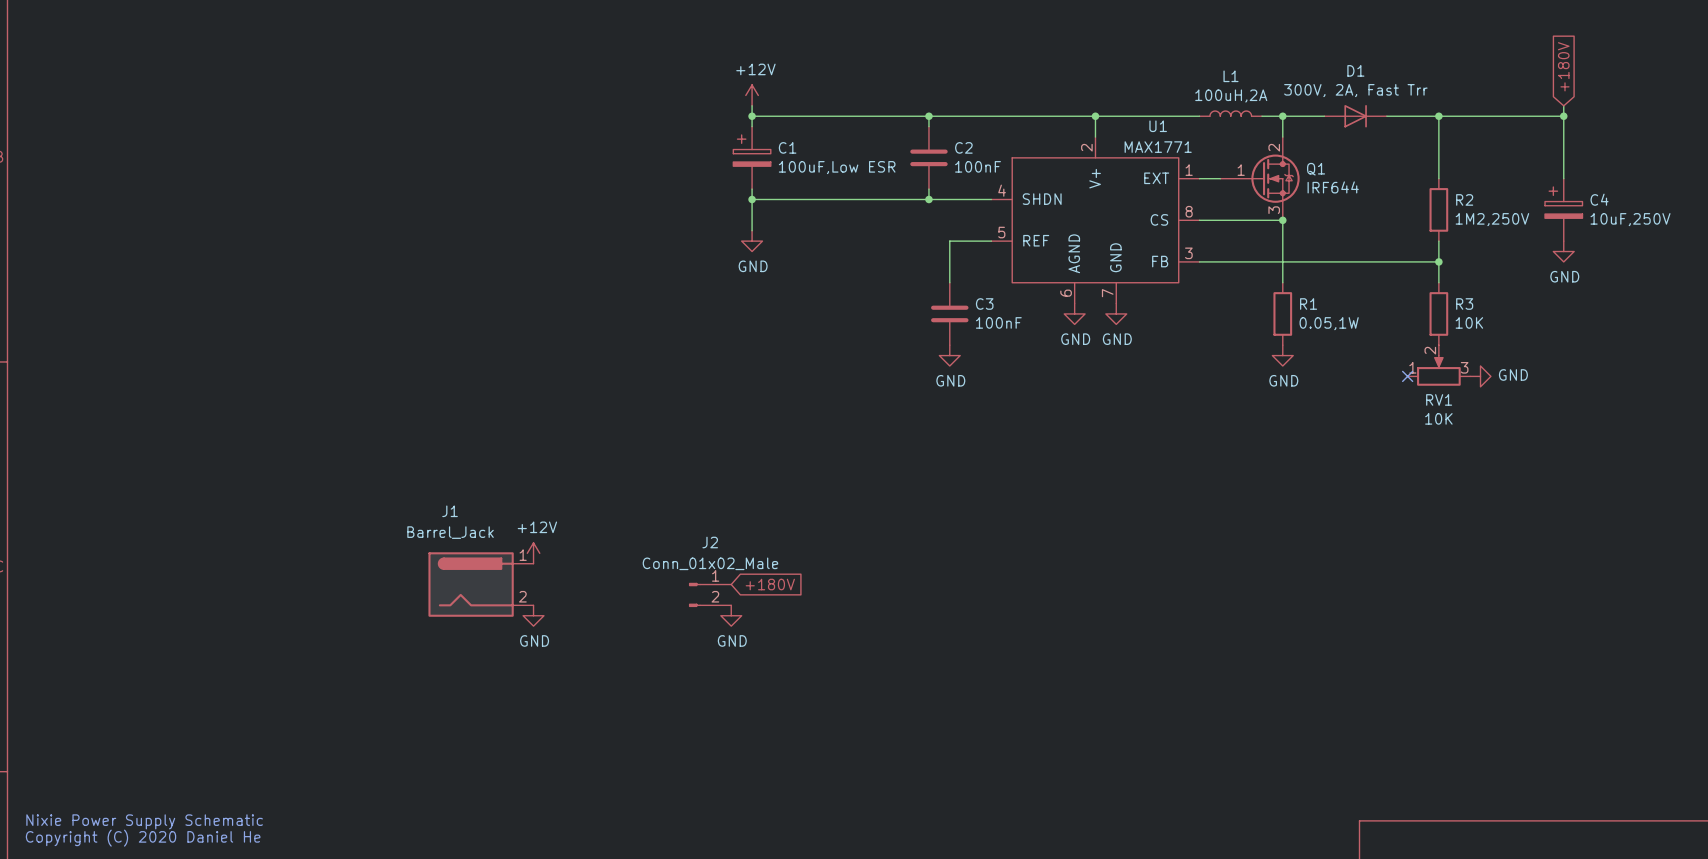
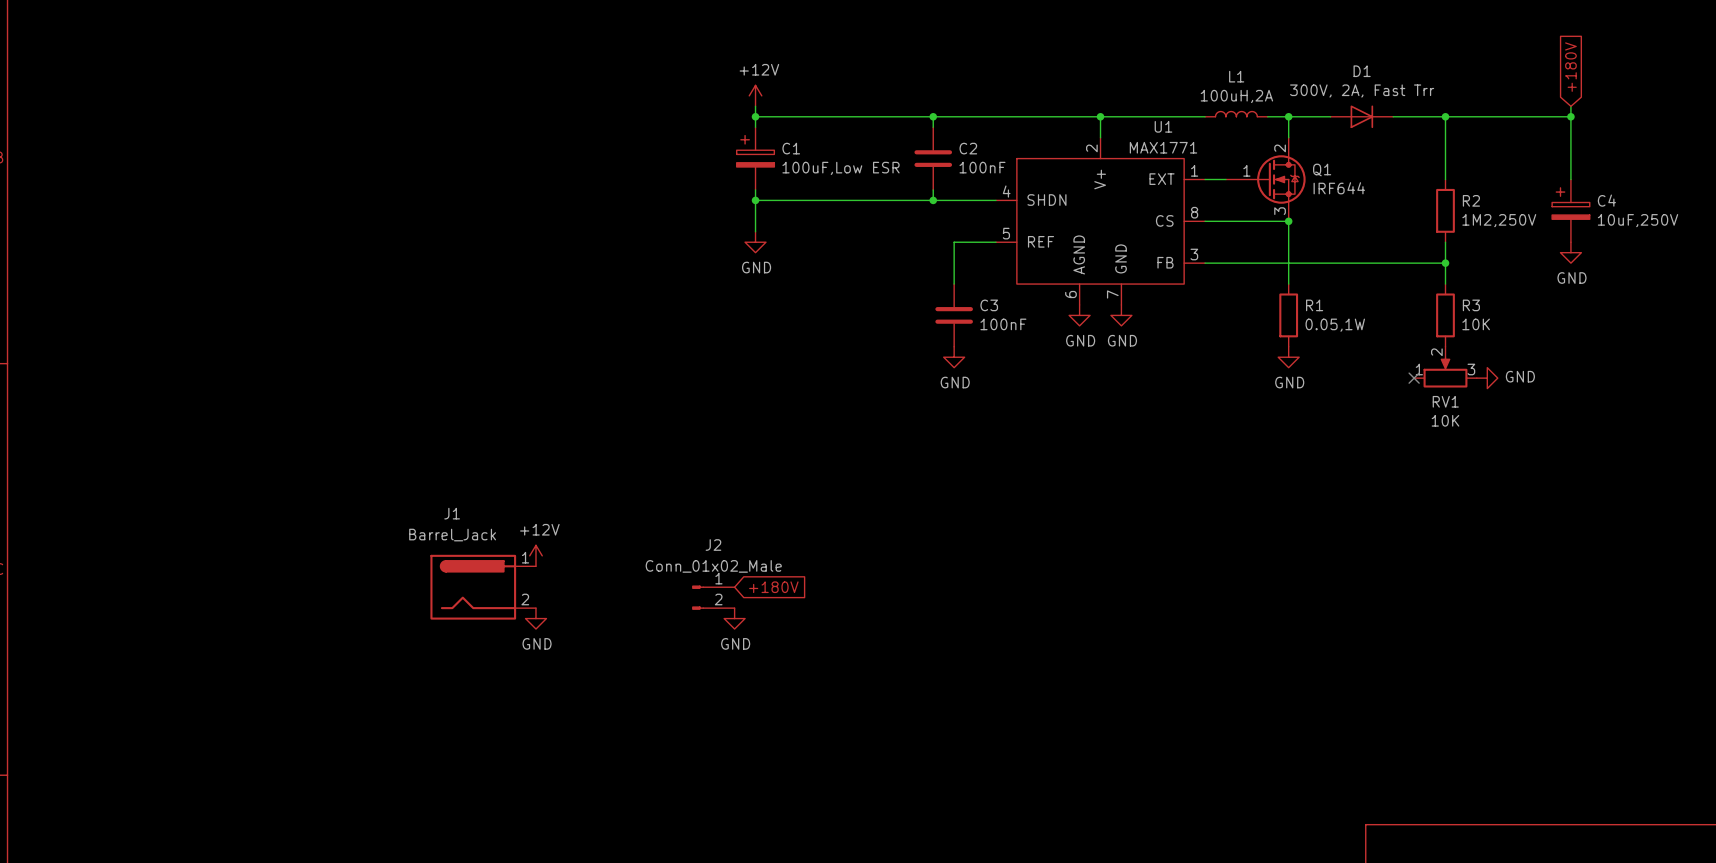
text: Nixie Power Supply Schematic (144, 821) -> none
text: Copyright (C) 2020 Daniel He (143, 838) -> none

